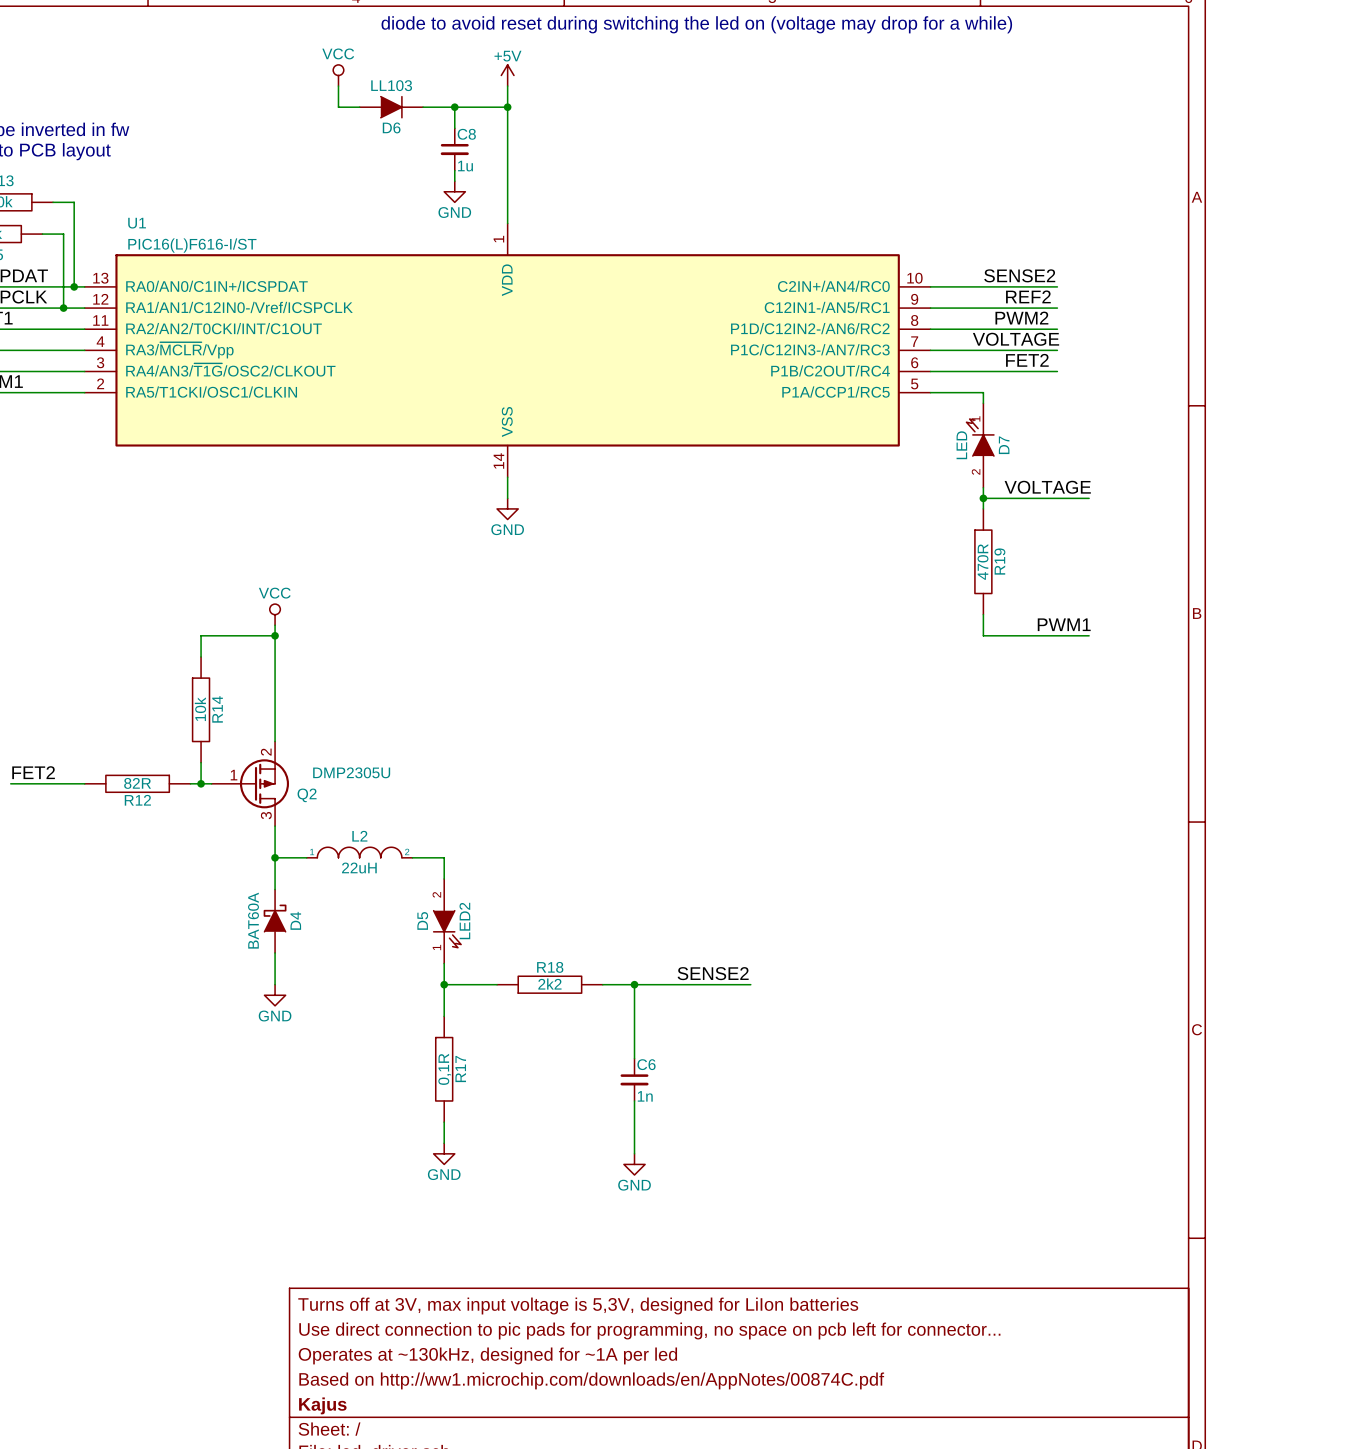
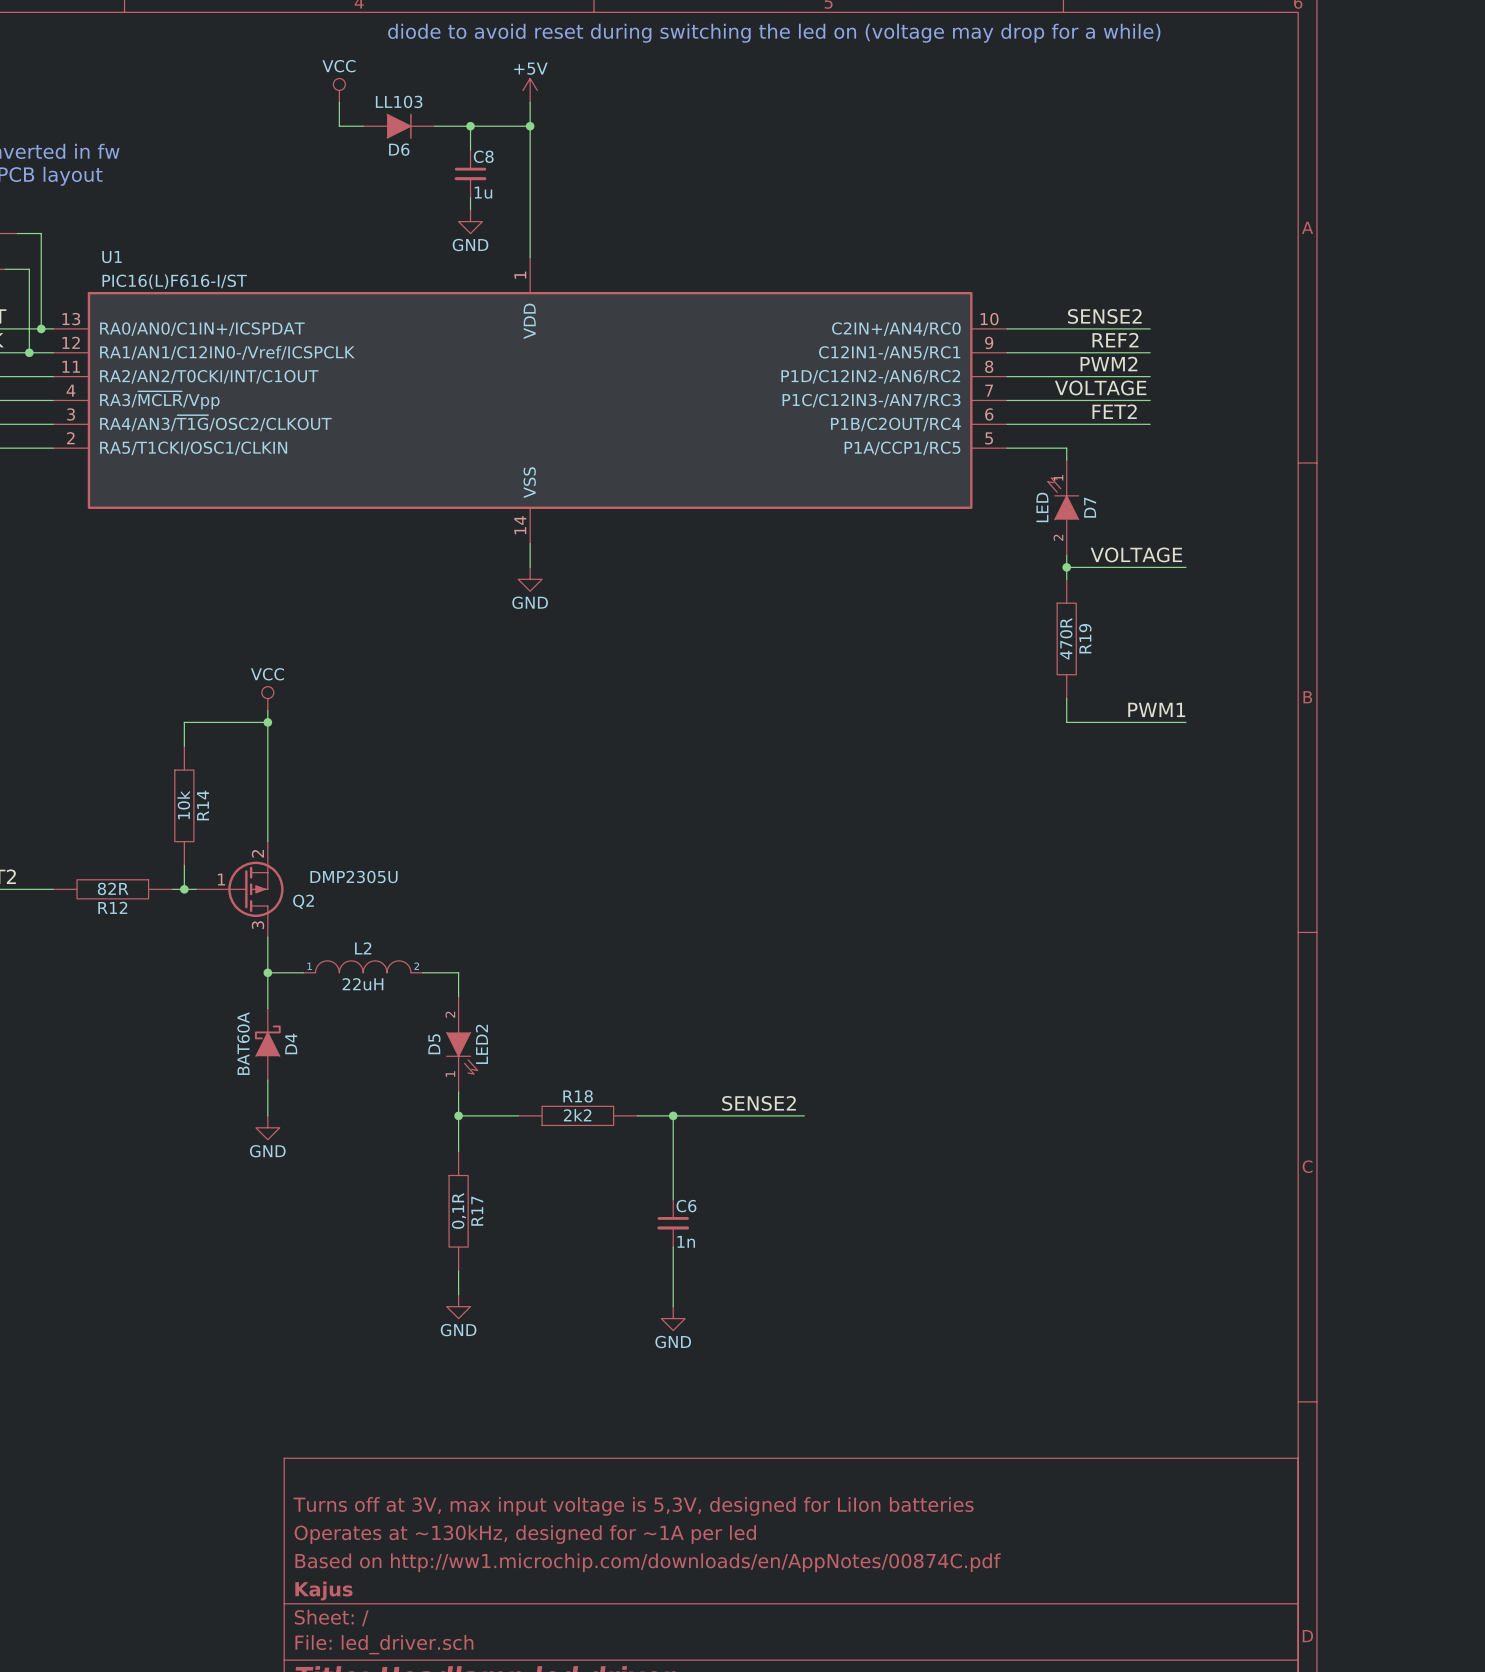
title block: Turns off at 3V, max input voltage is 5,3V, designed for LiIon batteries (578, 1306) -> none
title block: Use direct connection to pic pads for programming, no space on pcb left for connector... (649, 1330) -> Turns off at 3V, max input voltage is 5,3V, designed for LiIon batteries (633, 1506)

